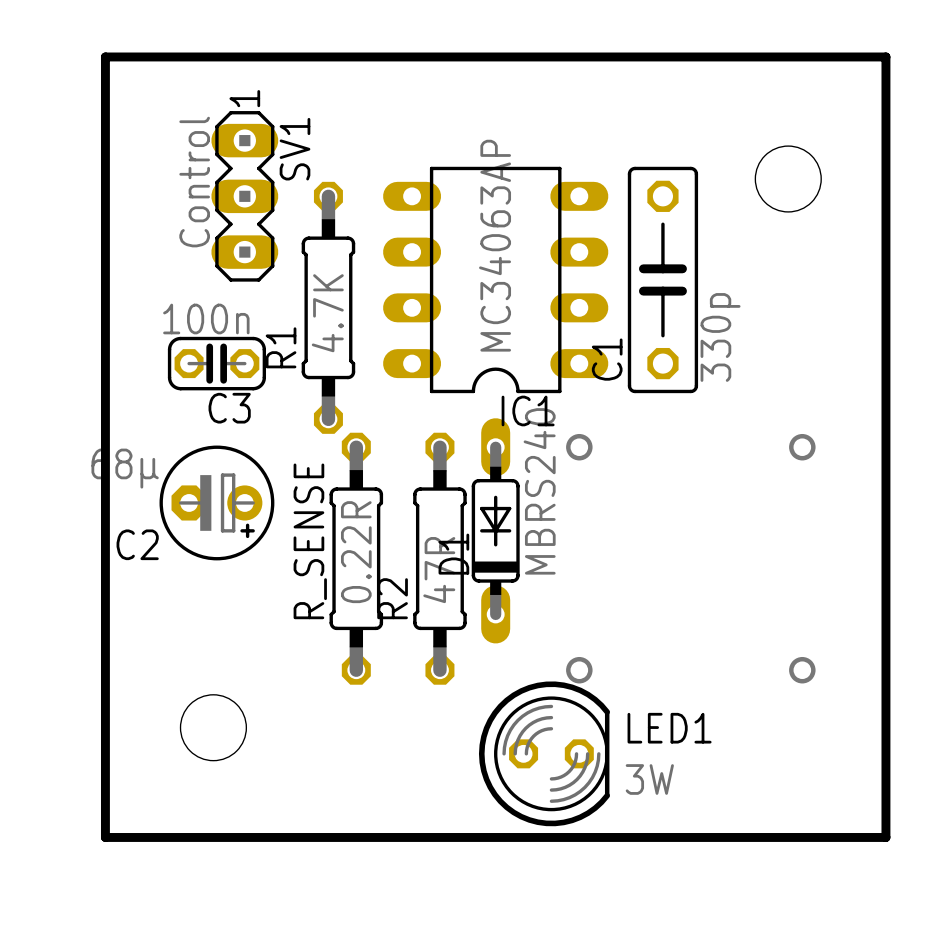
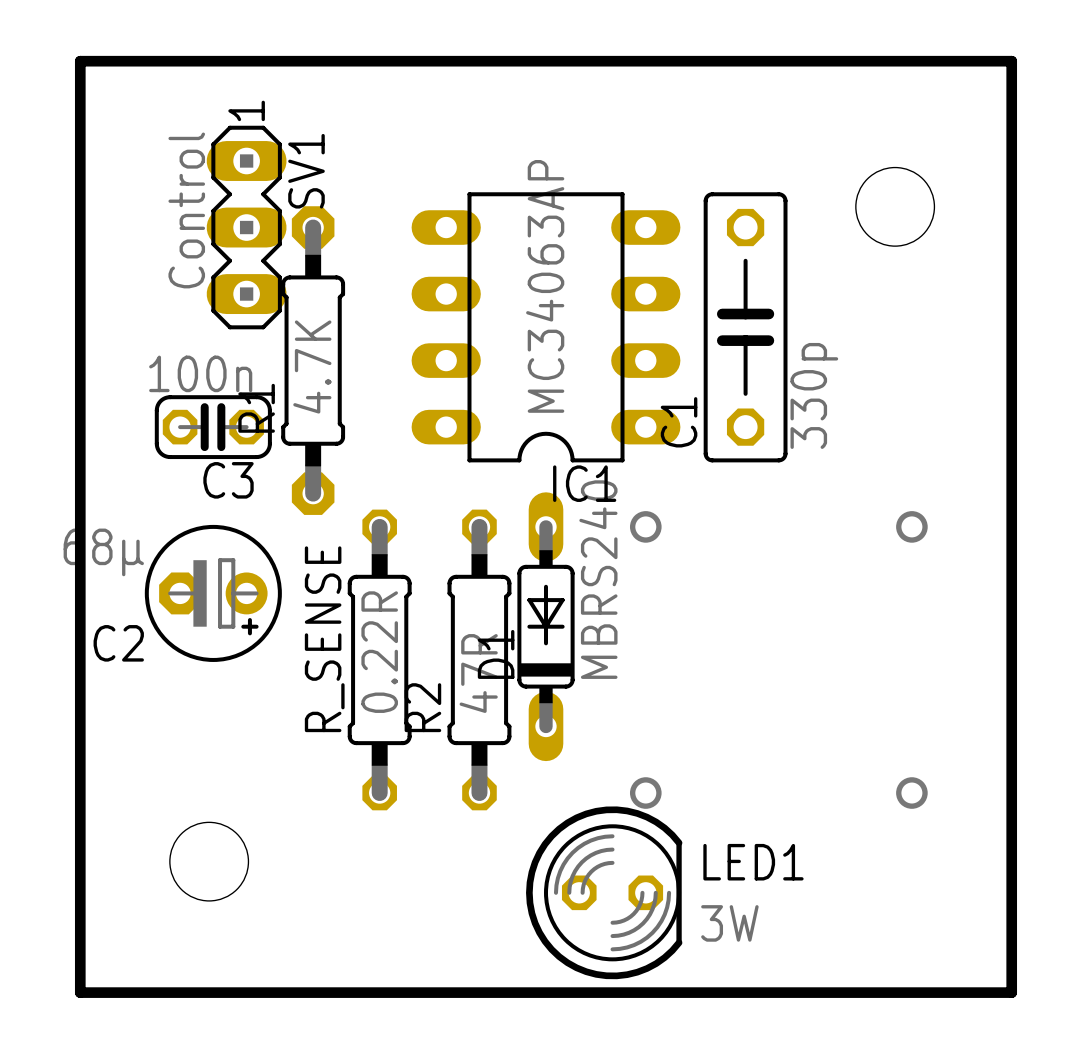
R1 footprint: [301, 181, 356, 434] -> [281, 206, 346, 515]

